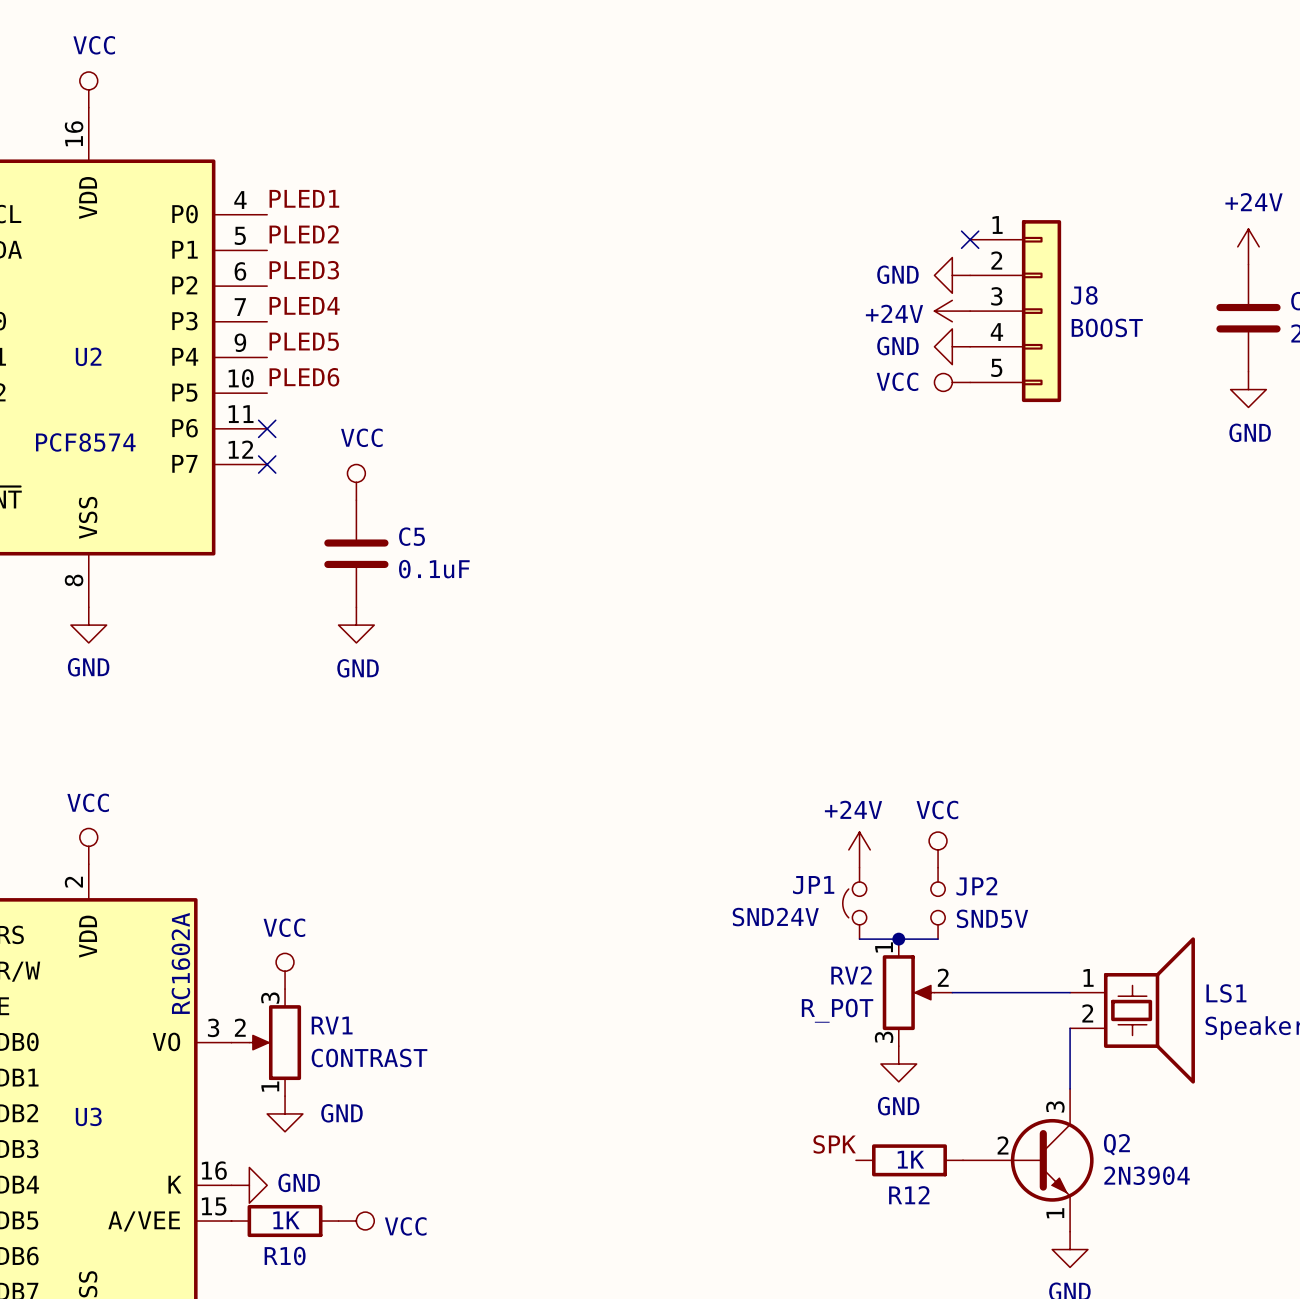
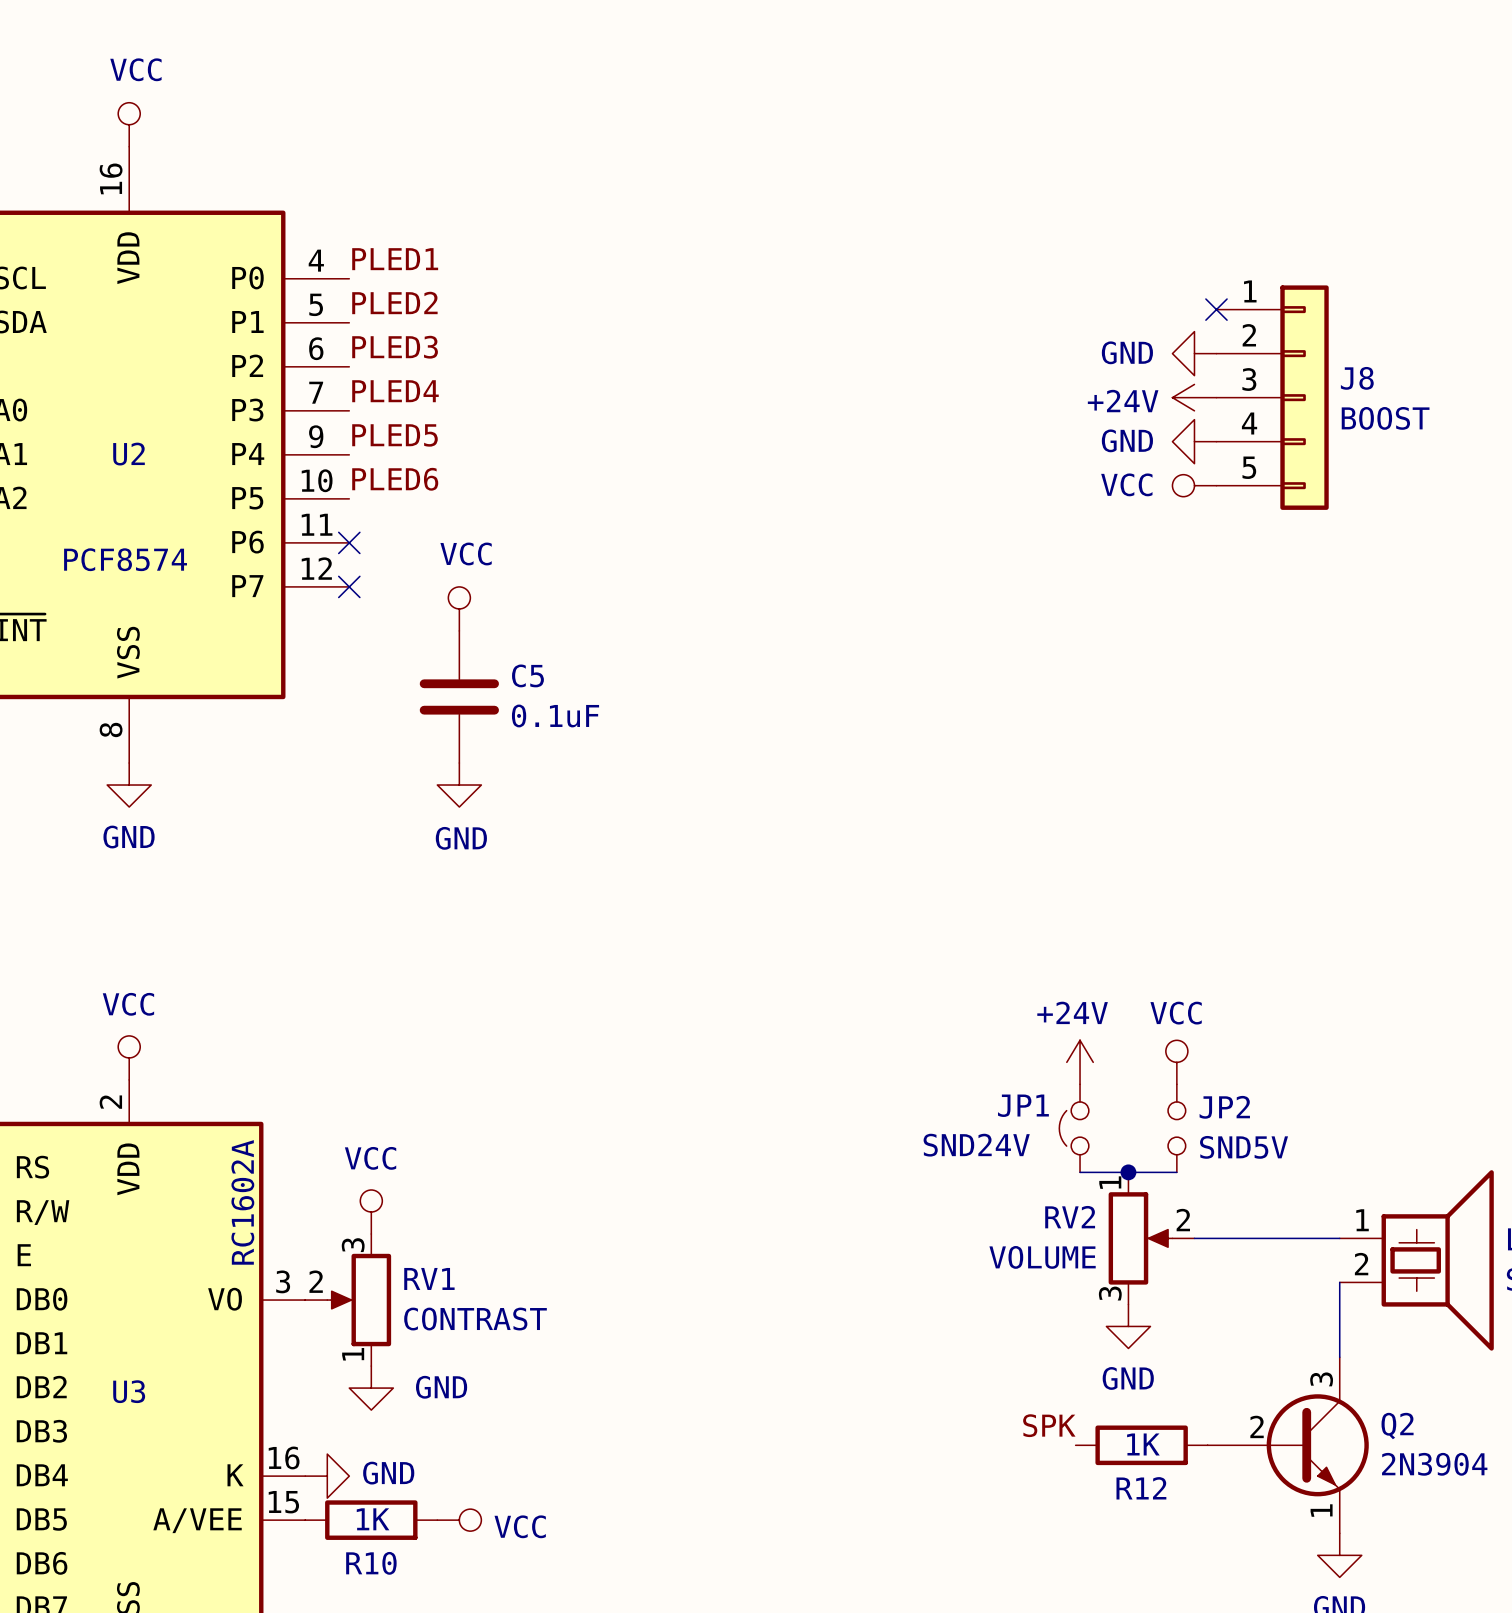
RV2 value: R_POT (837, 1010) -> VOLUME (1042, 1257)

